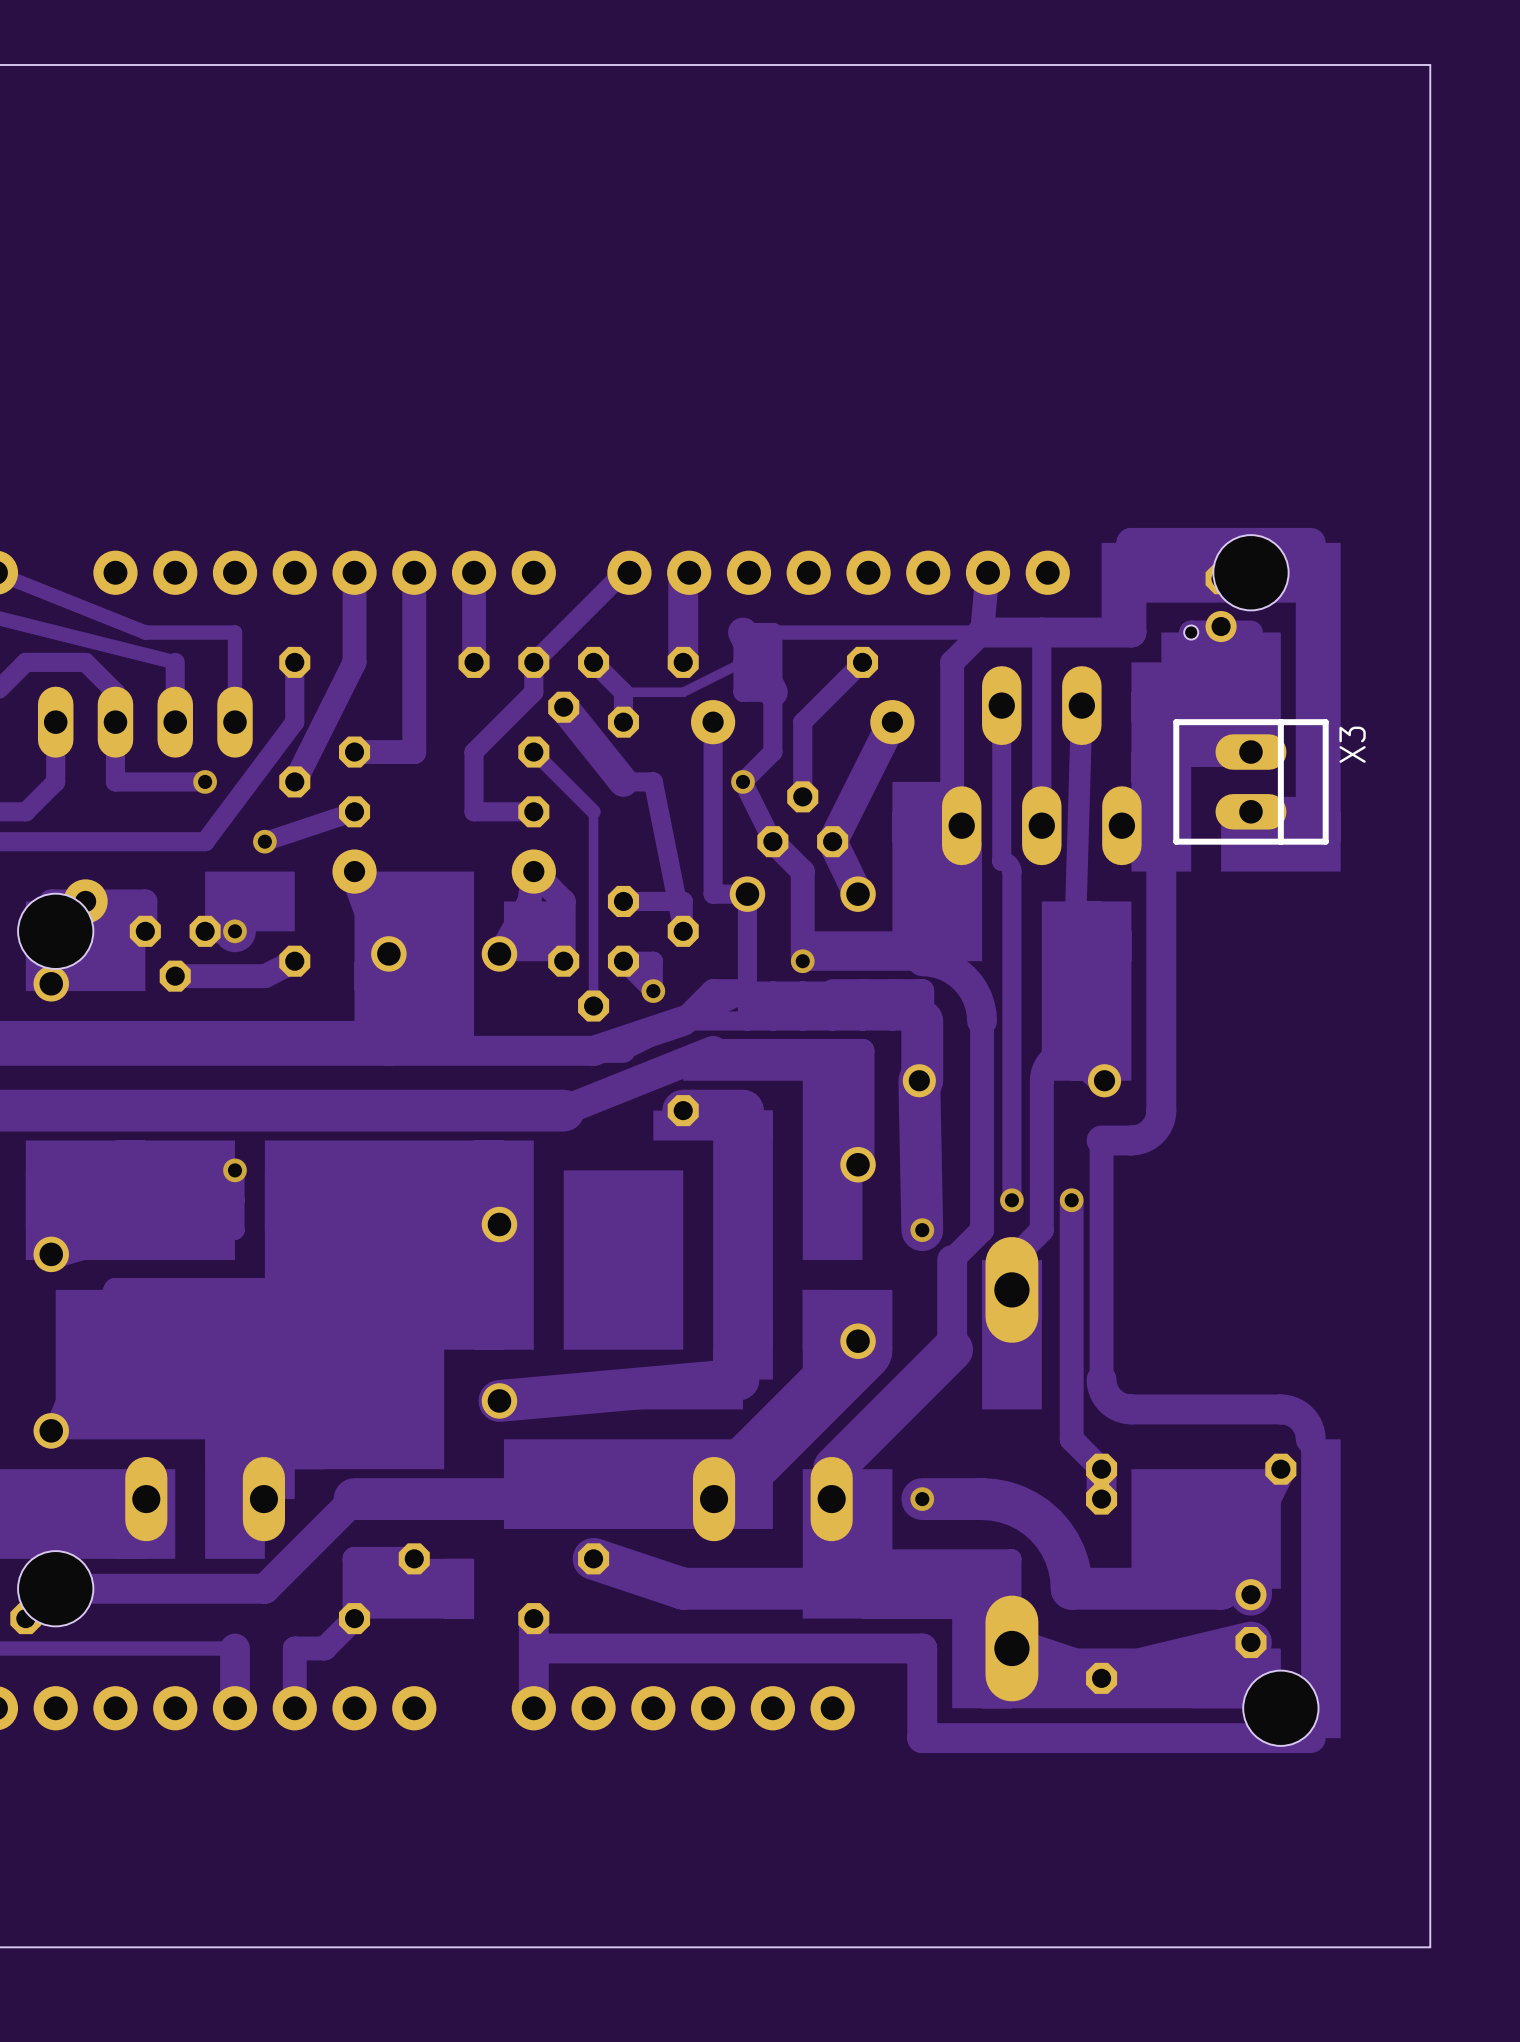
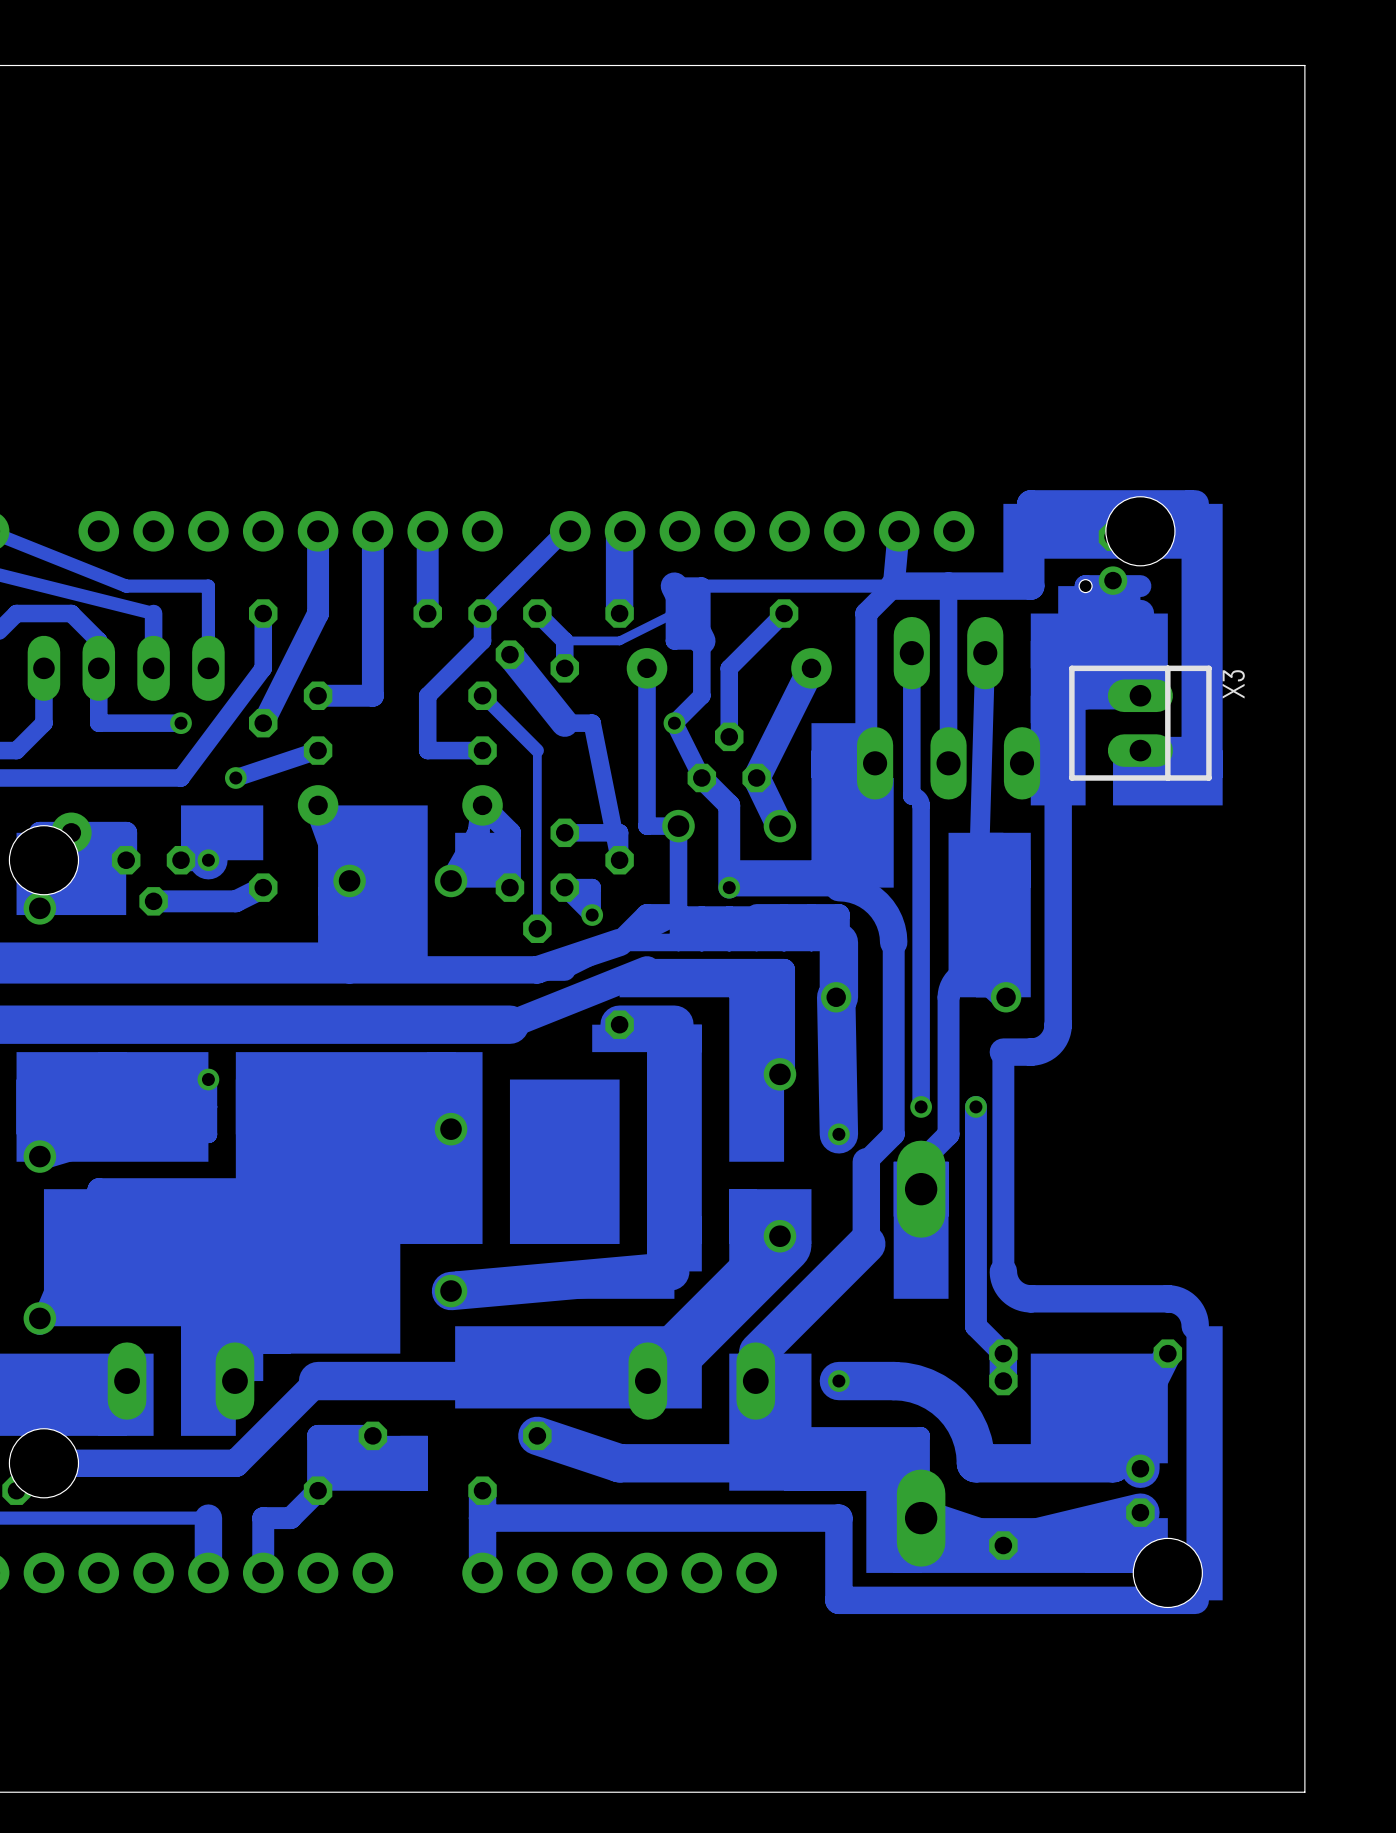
drawing: [1250, 632, 1281, 663] -> none

